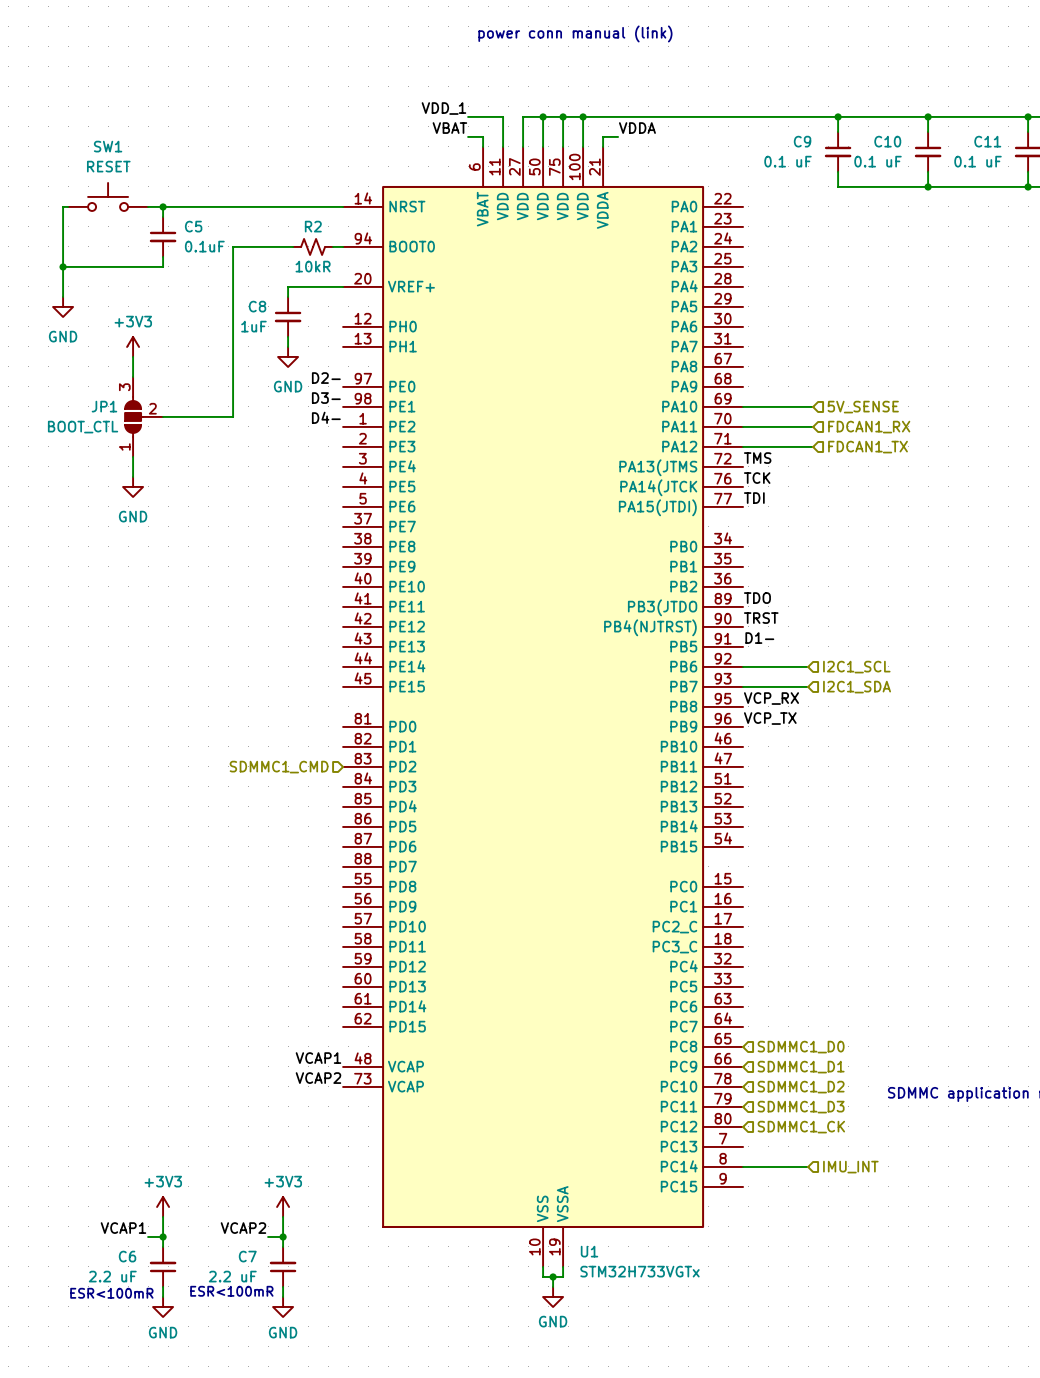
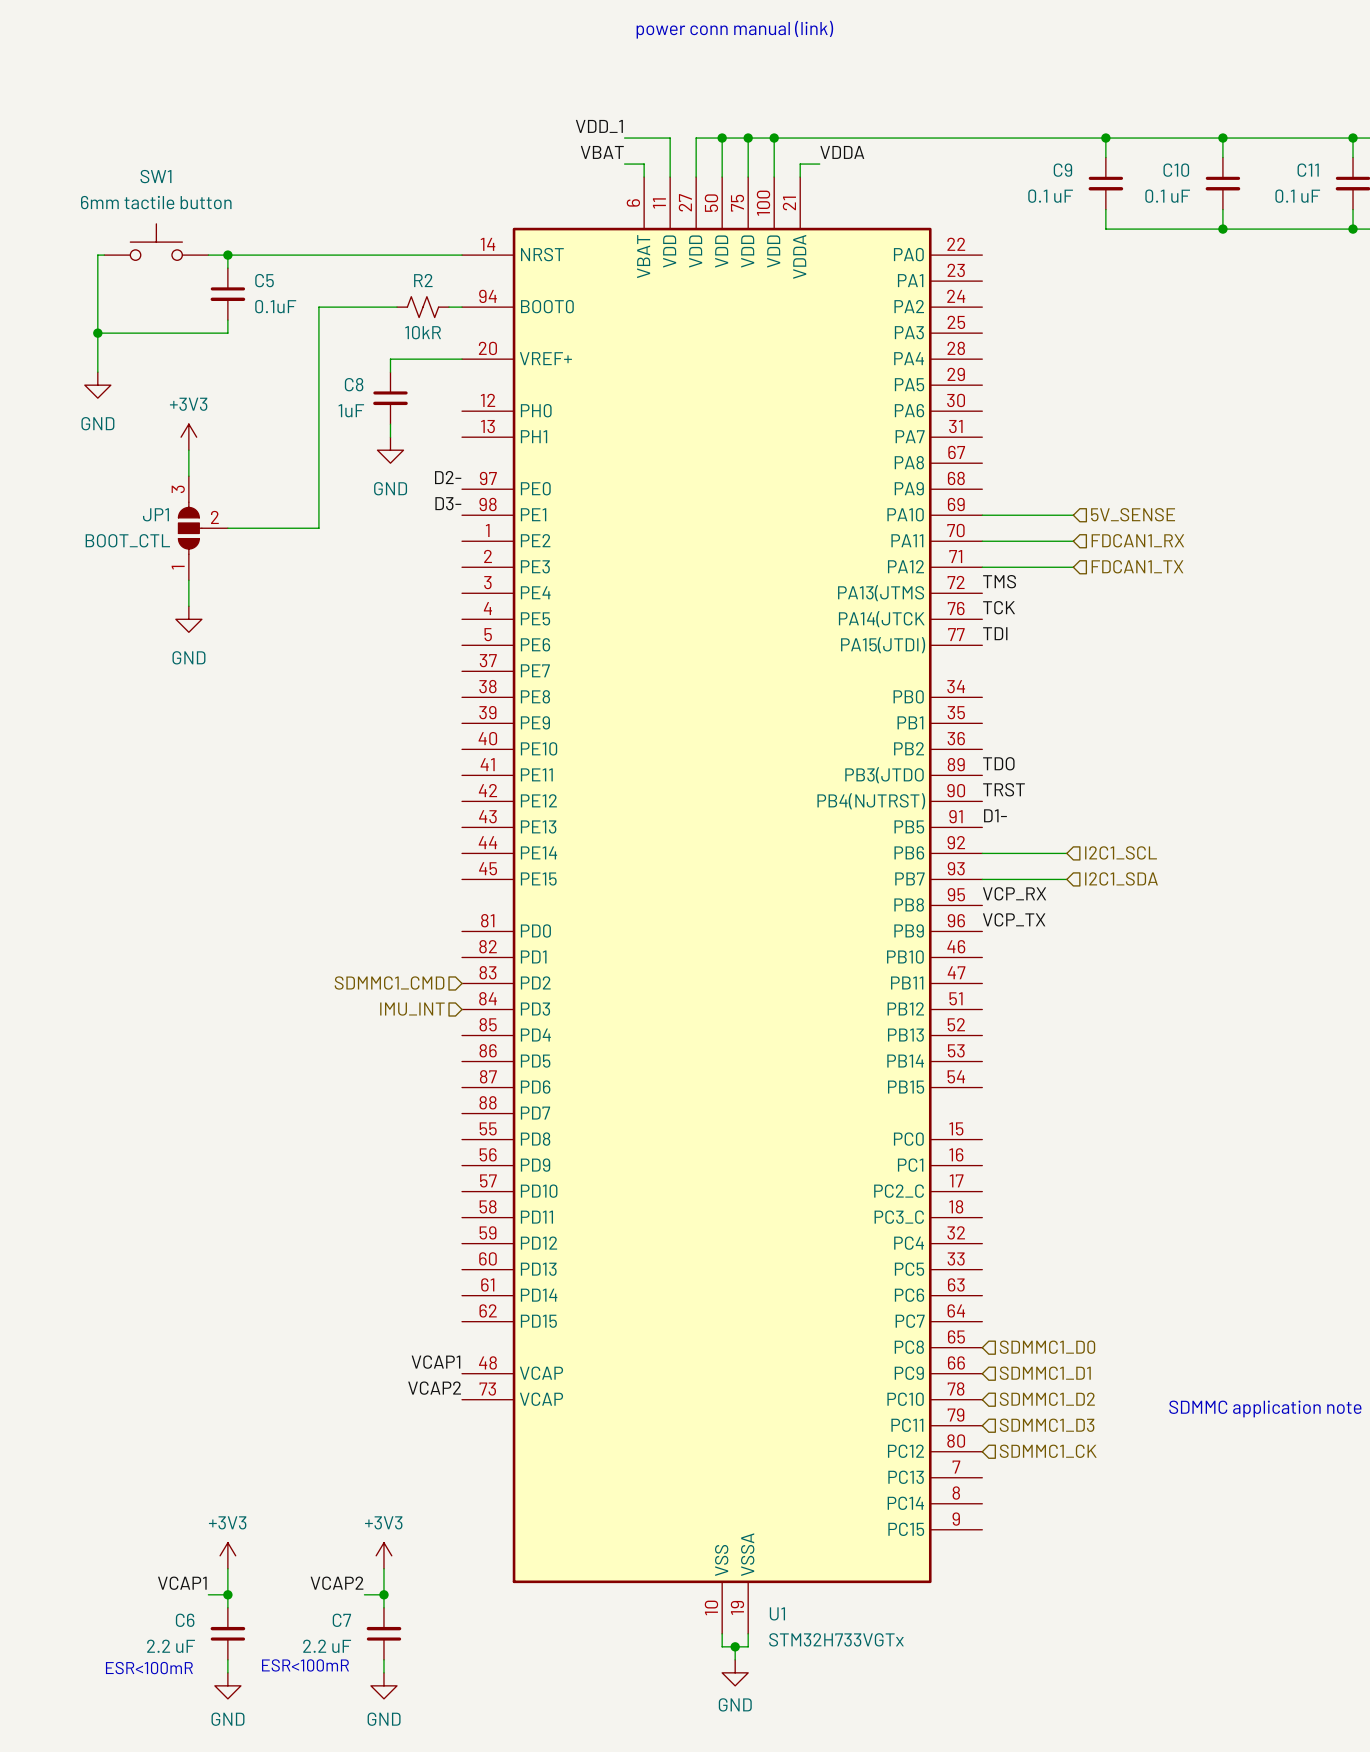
SW1 value: RESET (108, 166) -> 6mm tactile button (156, 202)
label: D4- (326, 417) -> none
hierarchical label: none -> IMU_INT (412, 1009)
wire: (743, 1166) (808, 1166) -> none
hierarchical label: IMU_INT (850, 1167) -> none

